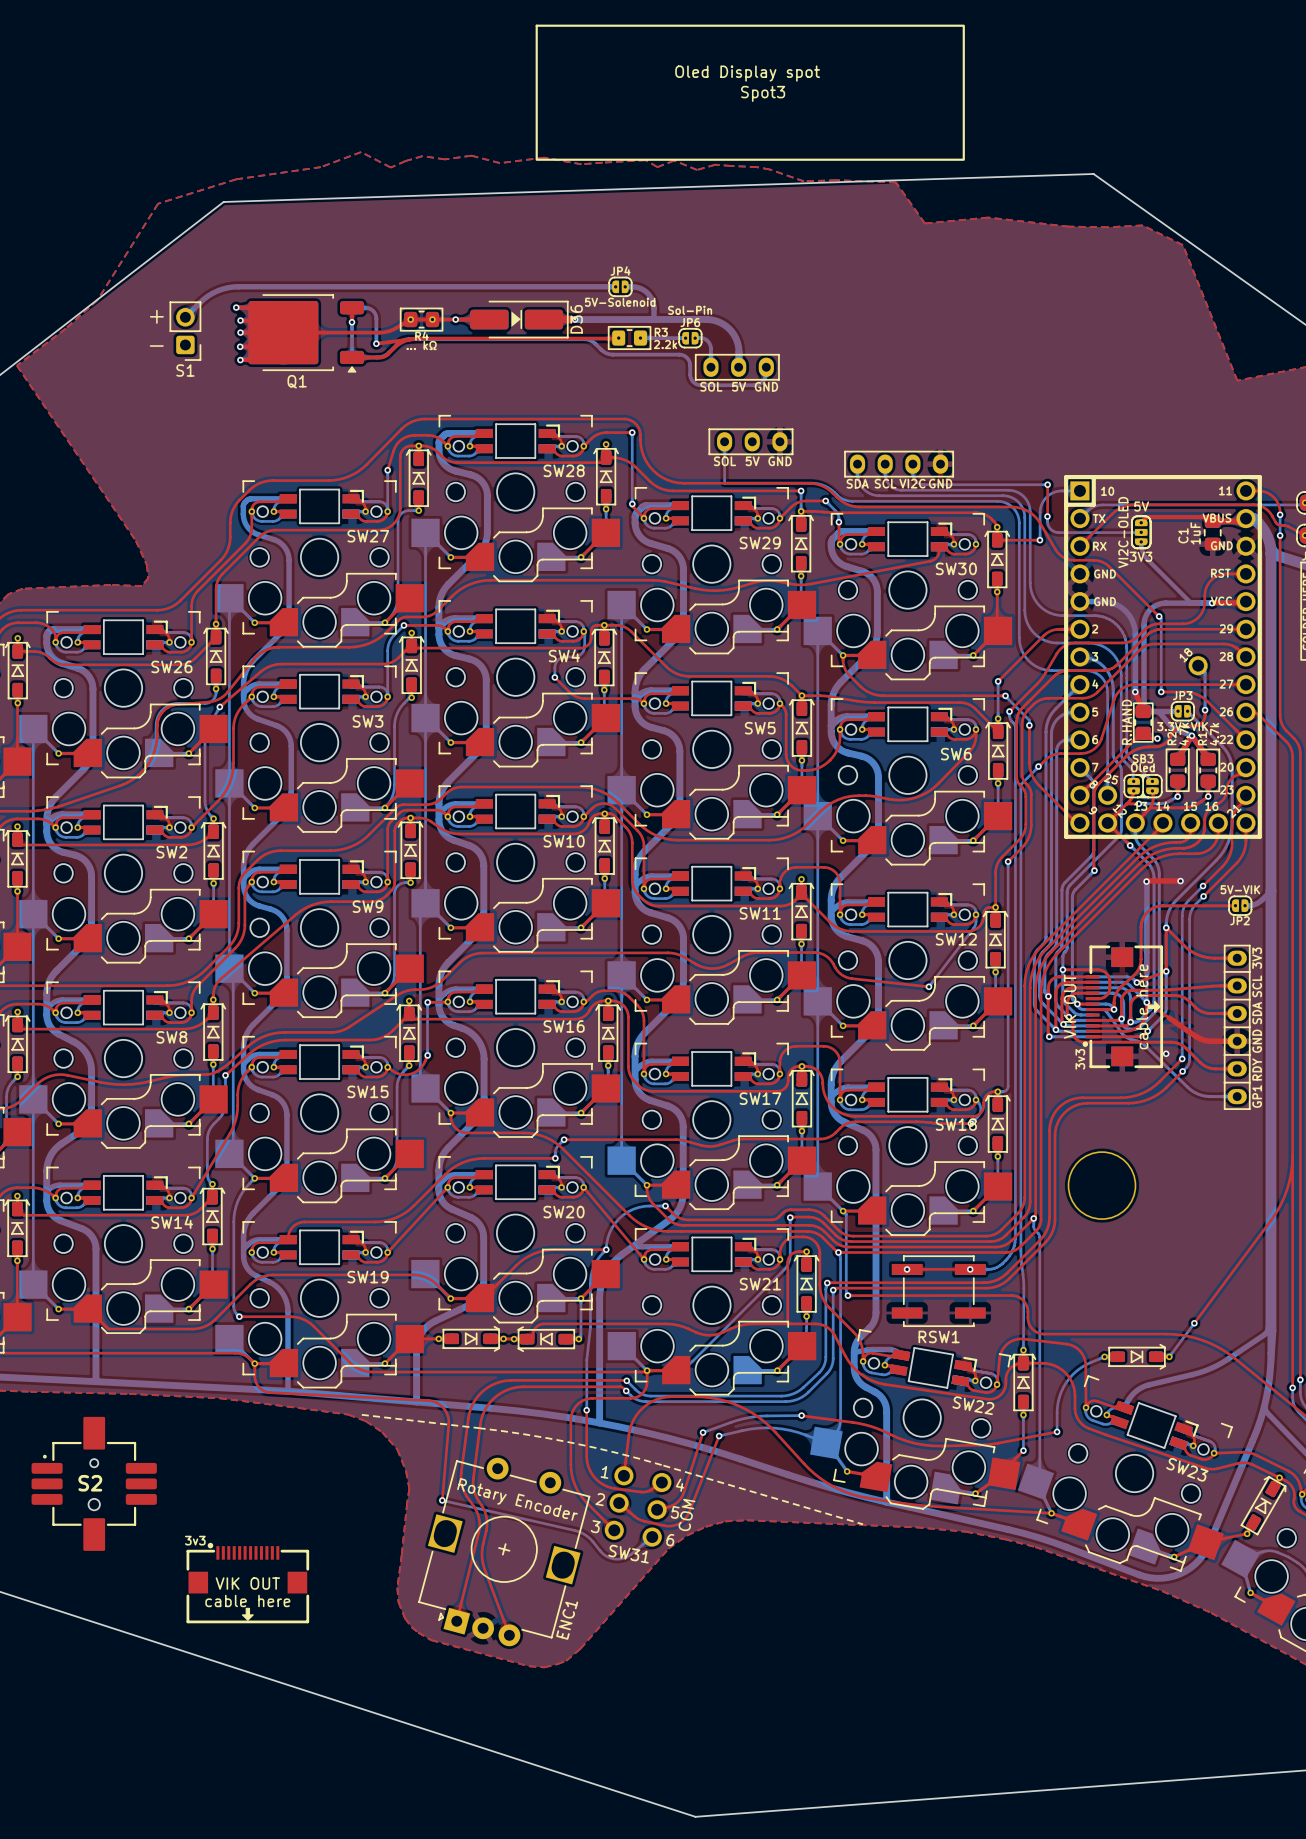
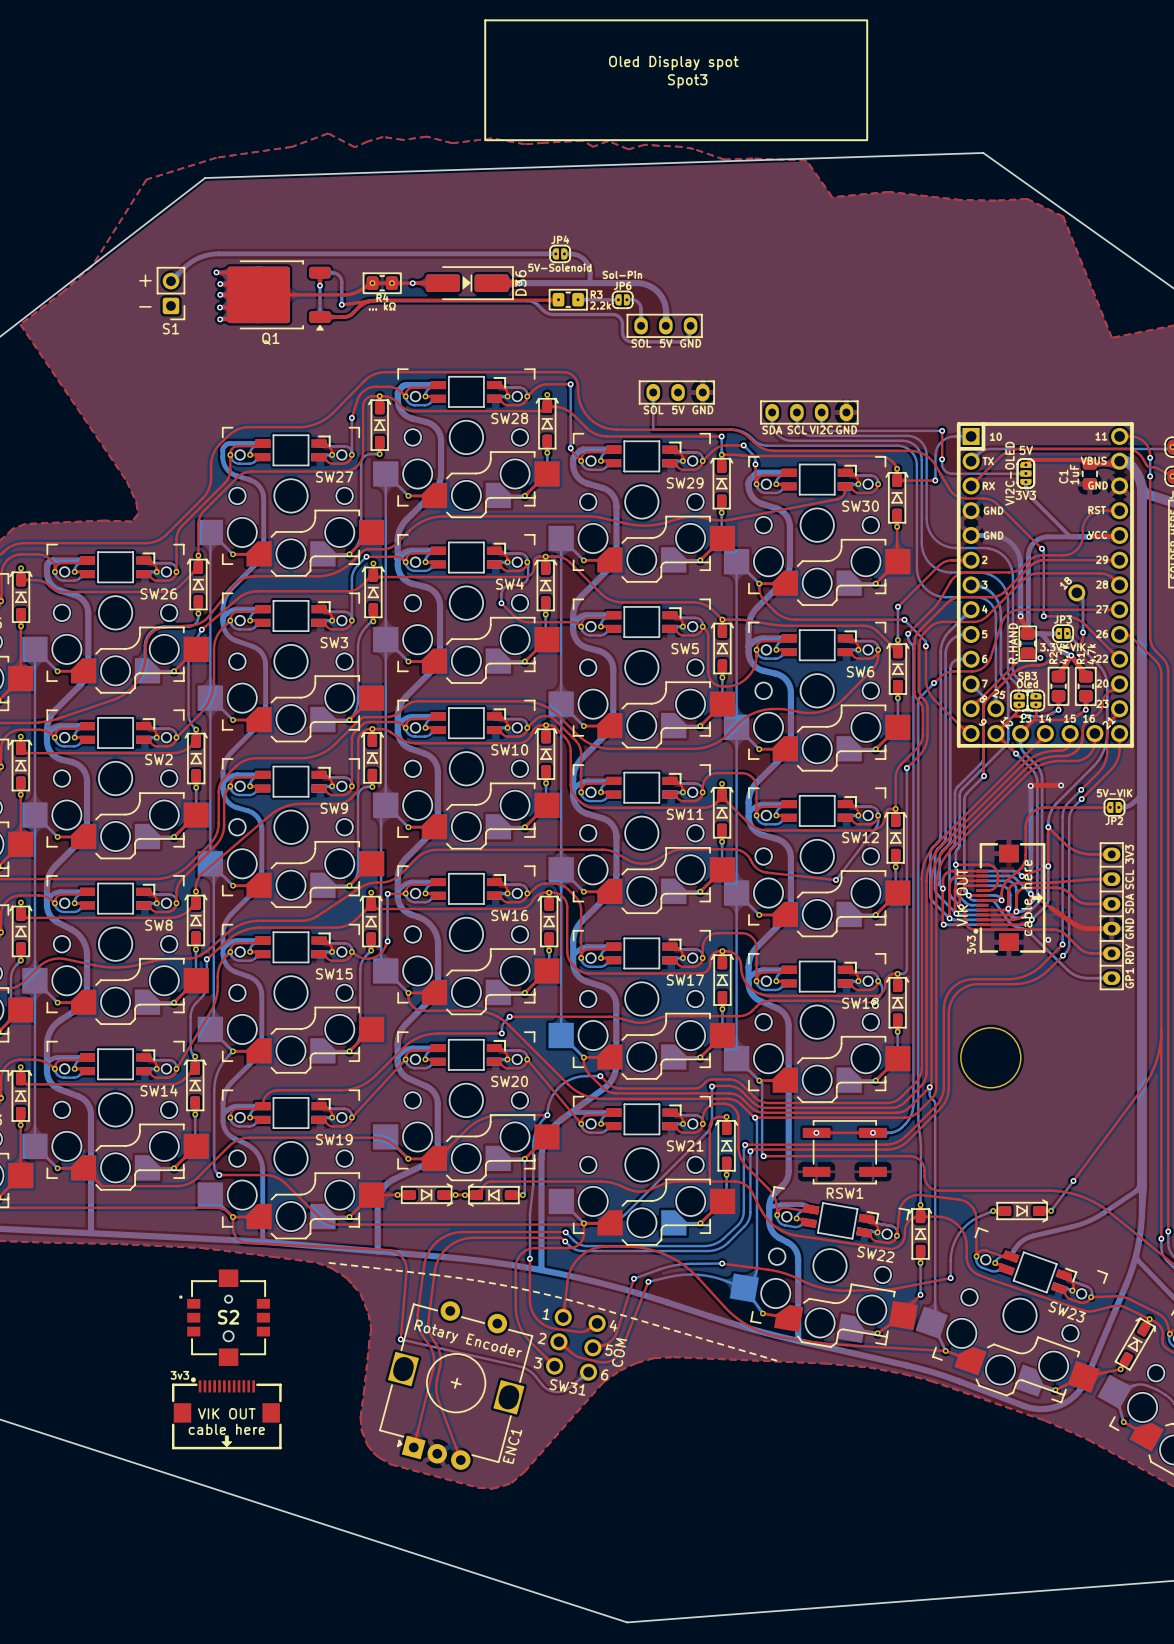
S2 footprint: [31, 1416, 157, 1551] -> [179, 1269, 270, 1366]

